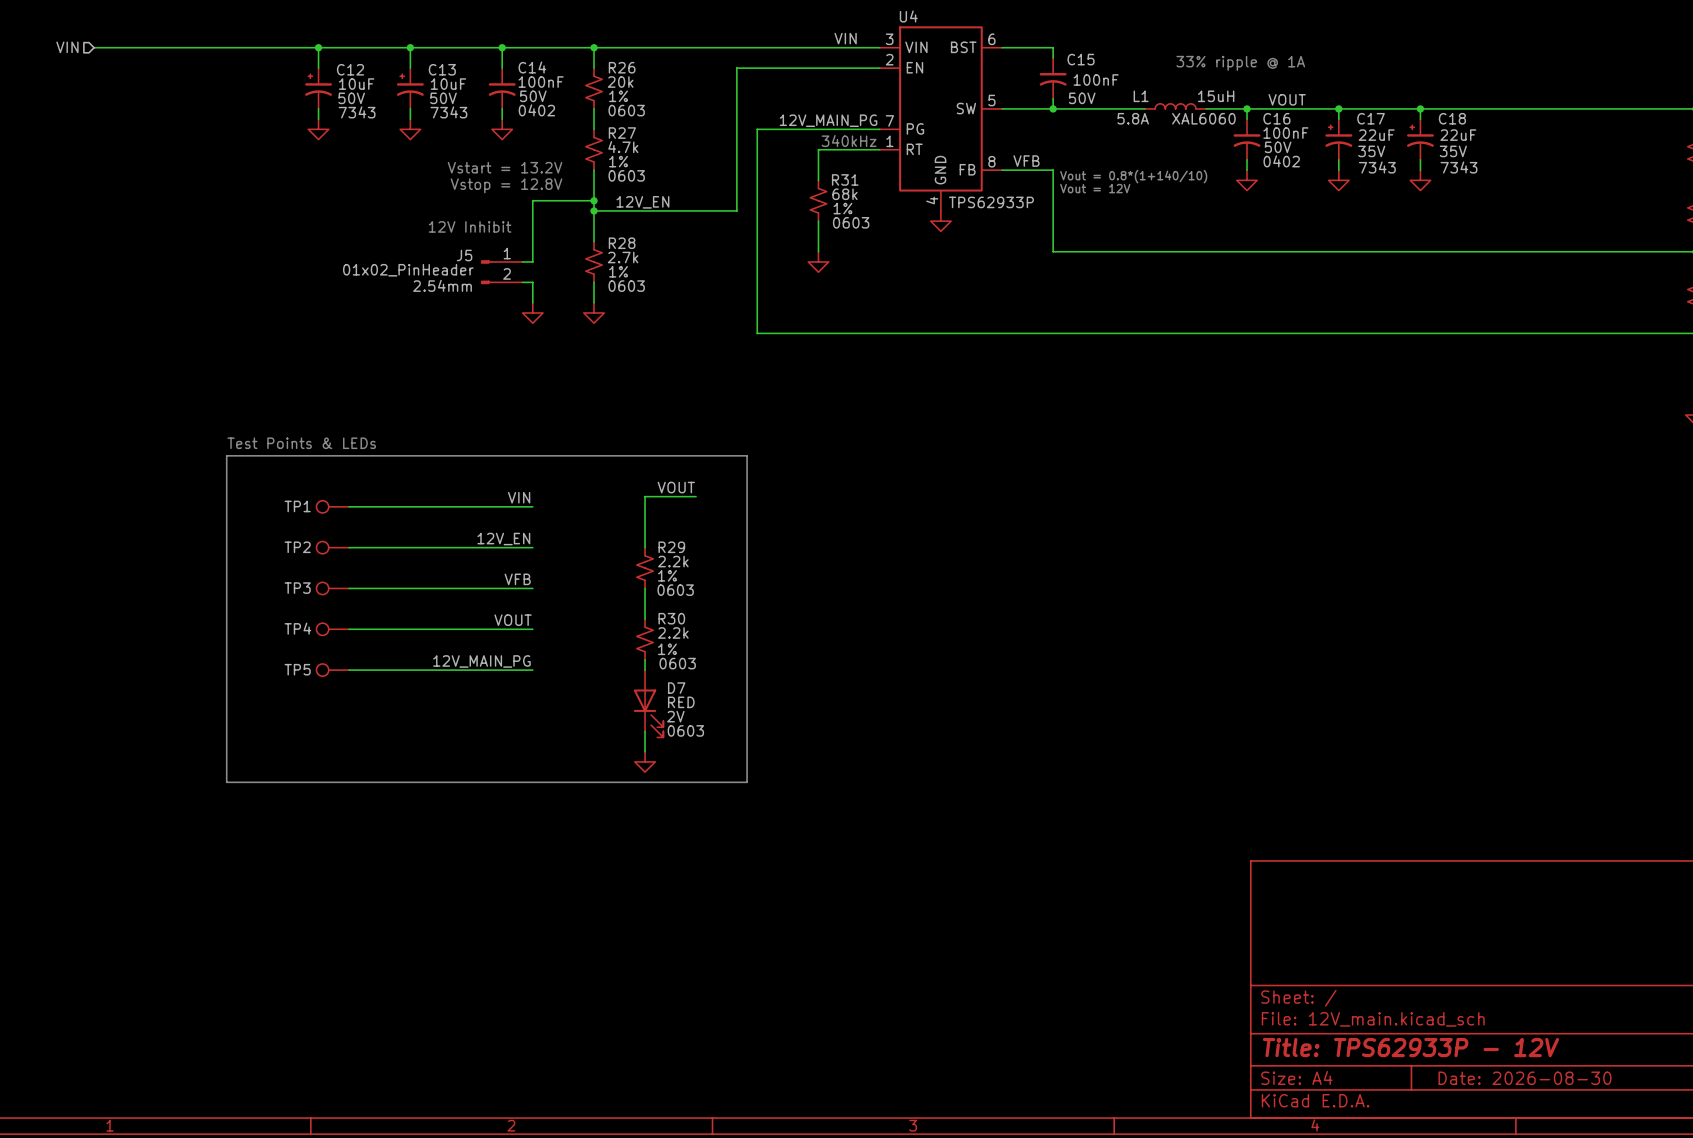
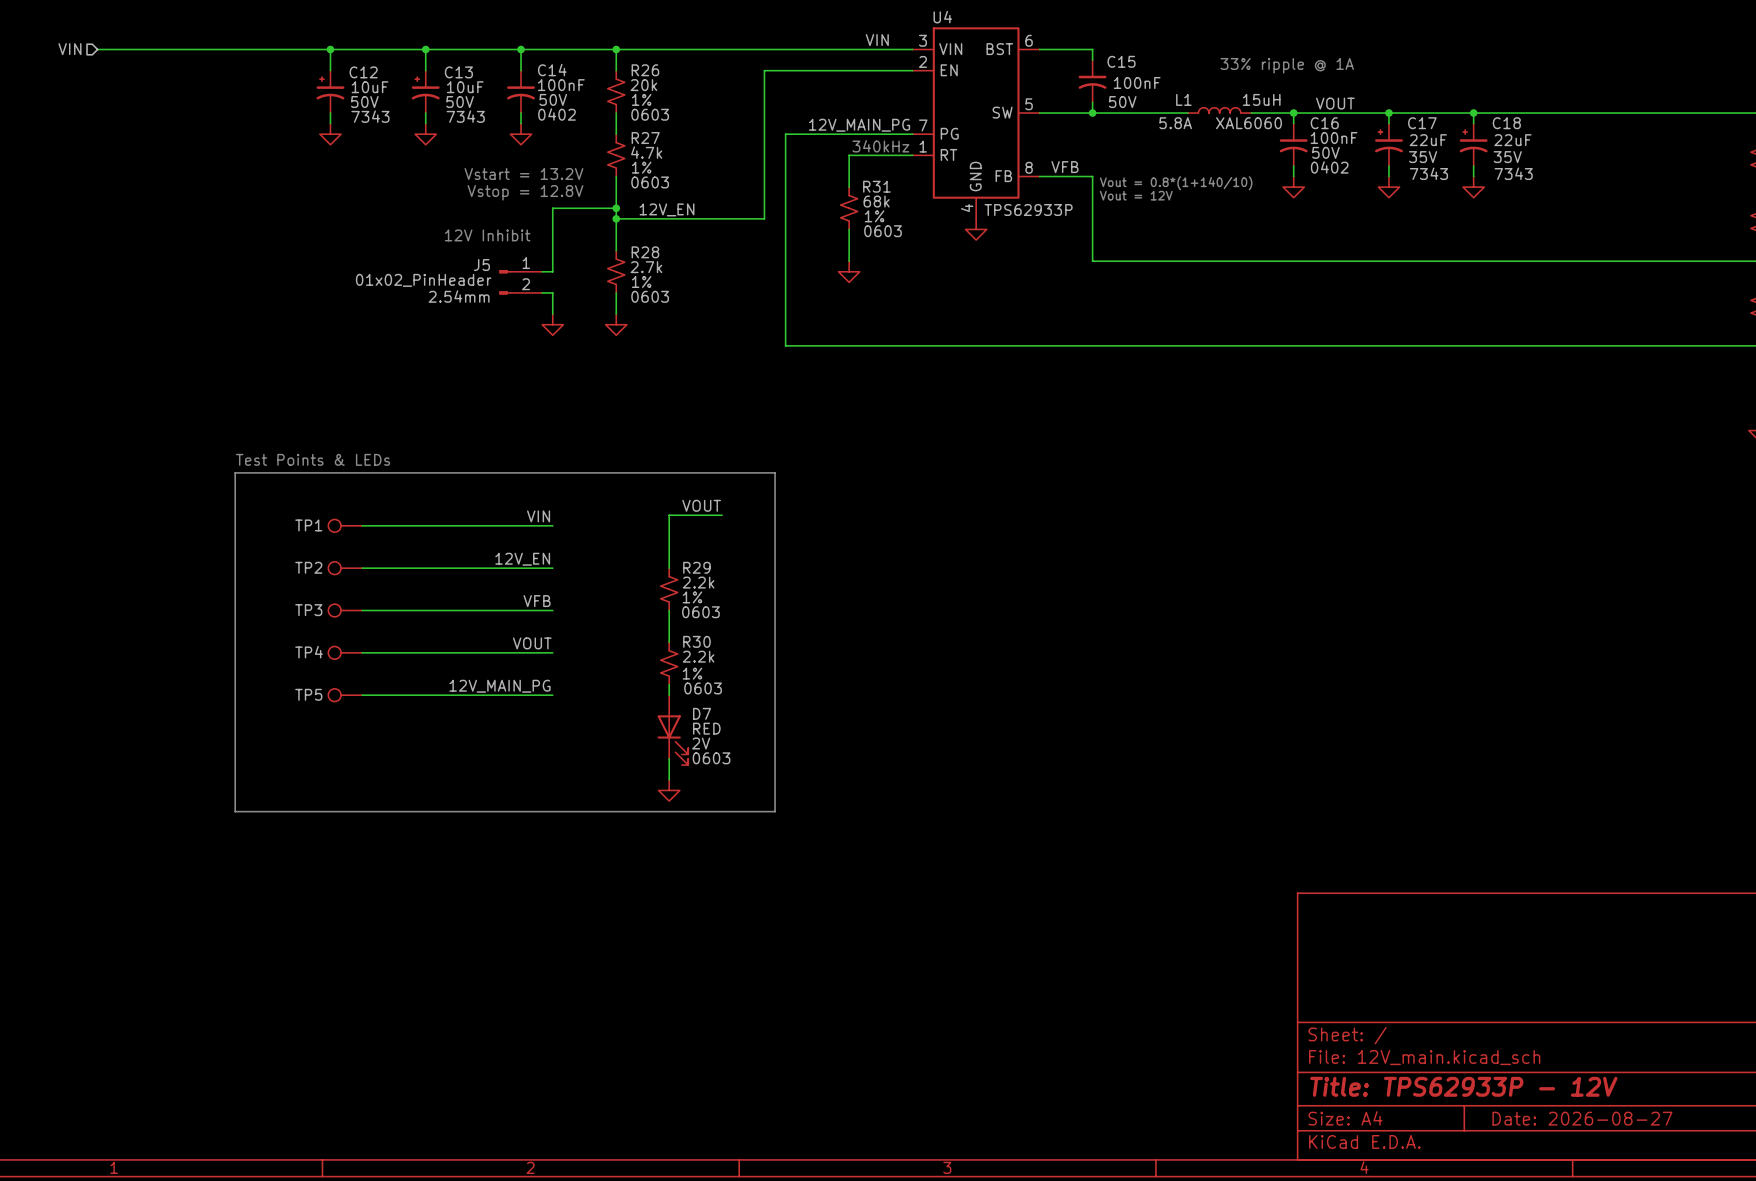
title block: Date: 2026-08-30 (1525, 1078) -> Date: 2026-08-27 (1582, 1118)

